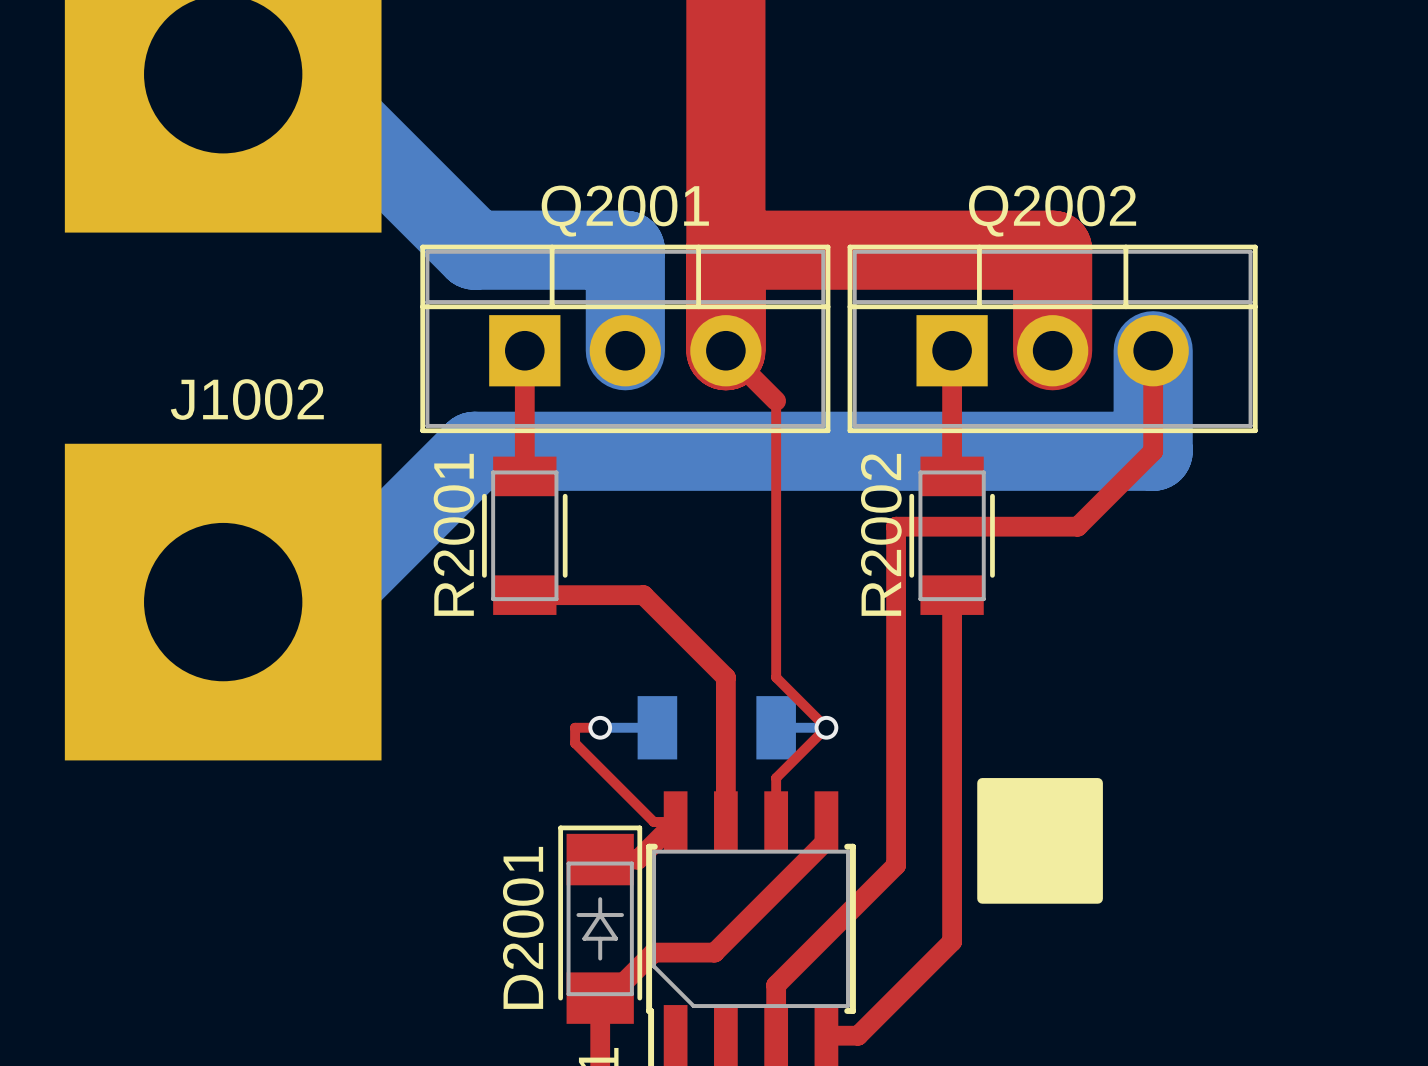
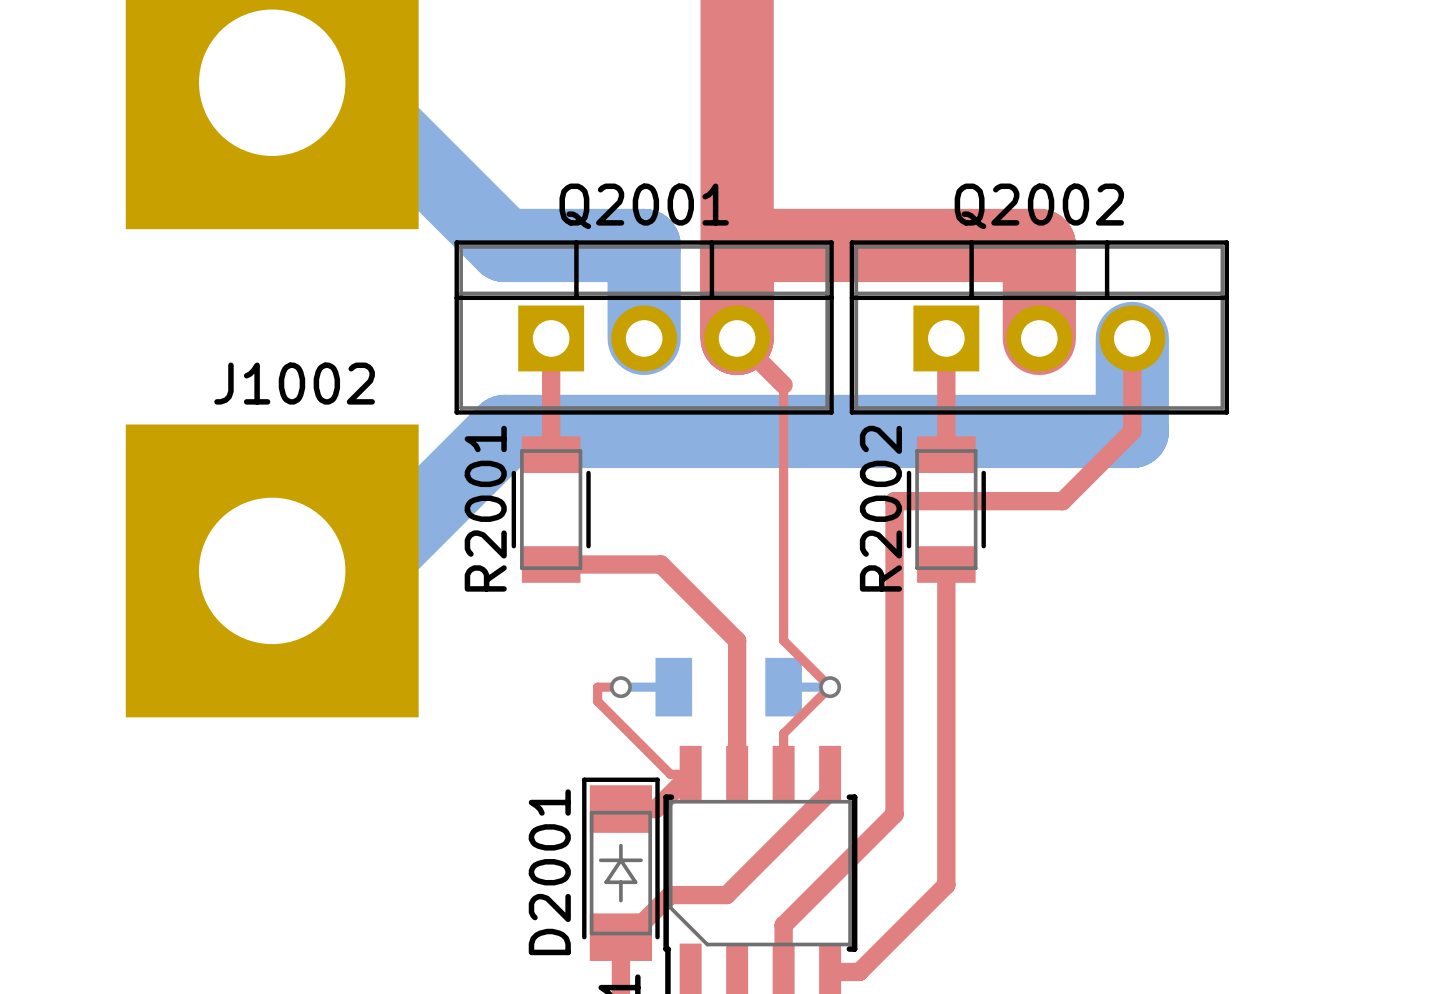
drawing: [977, 778, 1103, 904] -> none

